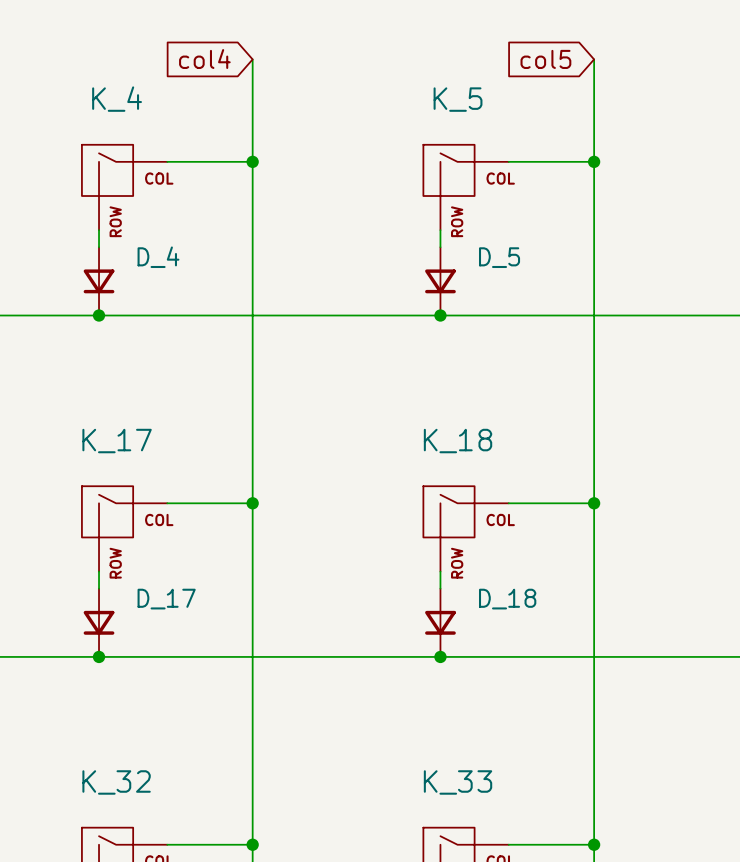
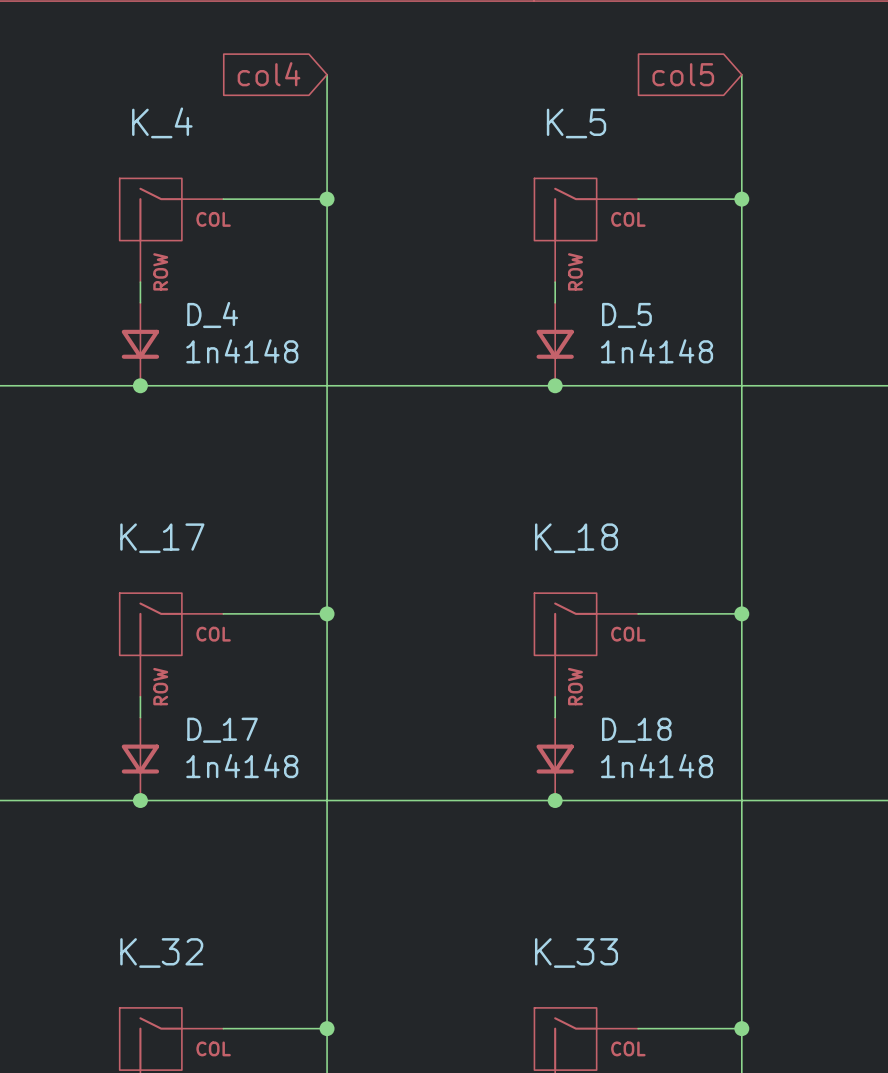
D_4 value: none -> 1n4148 (242, 351)
D_5 value: none -> 1n4148 (657, 351)
D_17 value: none -> 1n4148 (242, 766)
D_18 value: none -> 1n4148 (657, 766)

